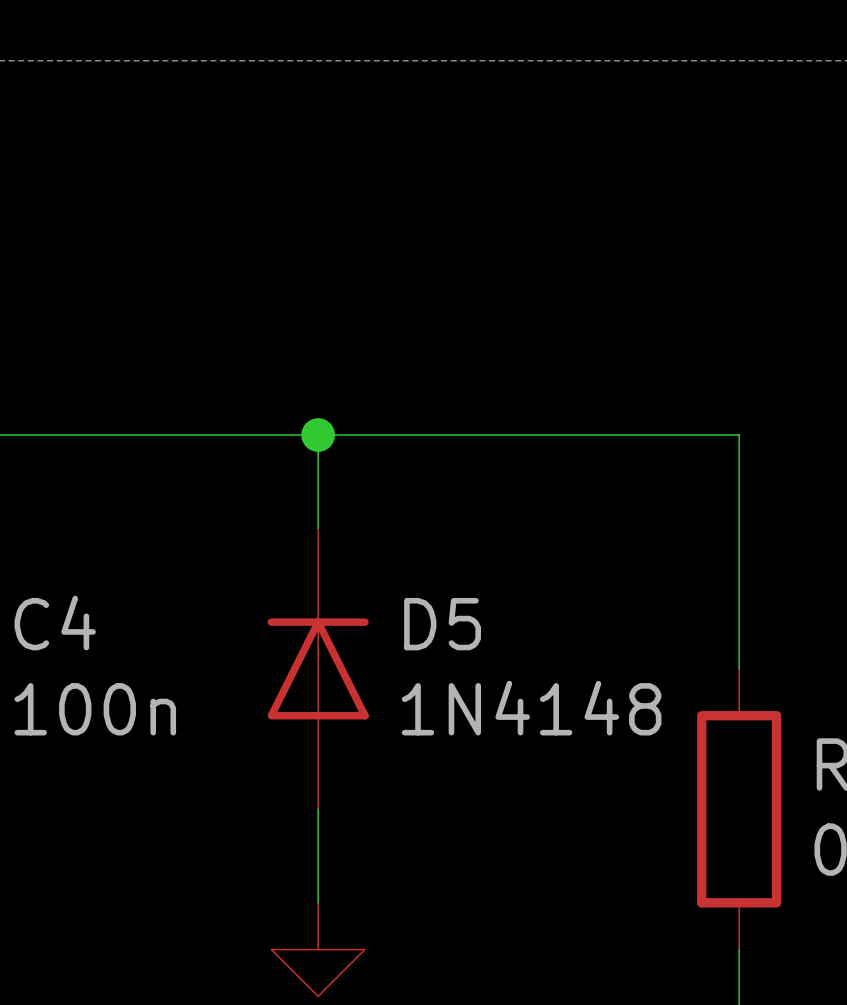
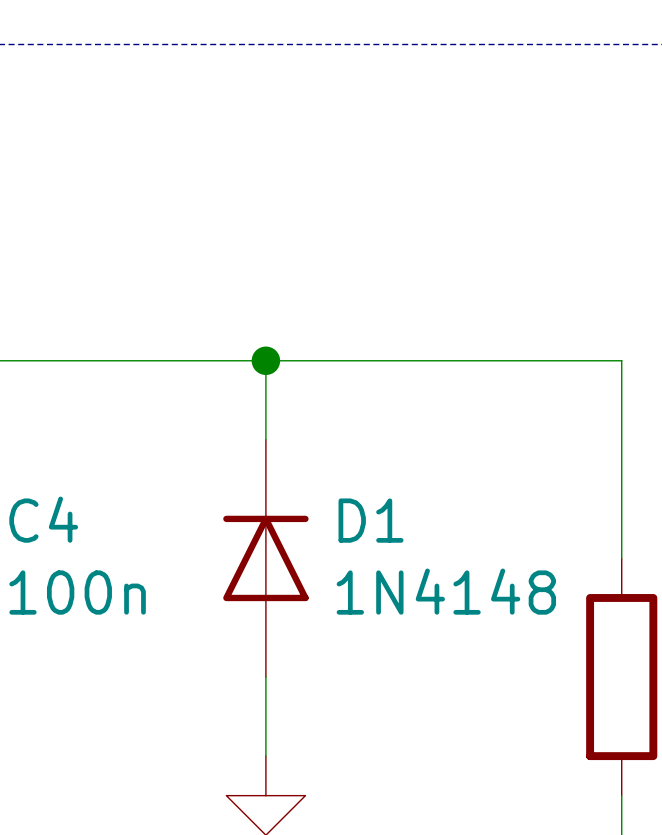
D5 name: D5 (442, 624) -> D1 (371, 520)

